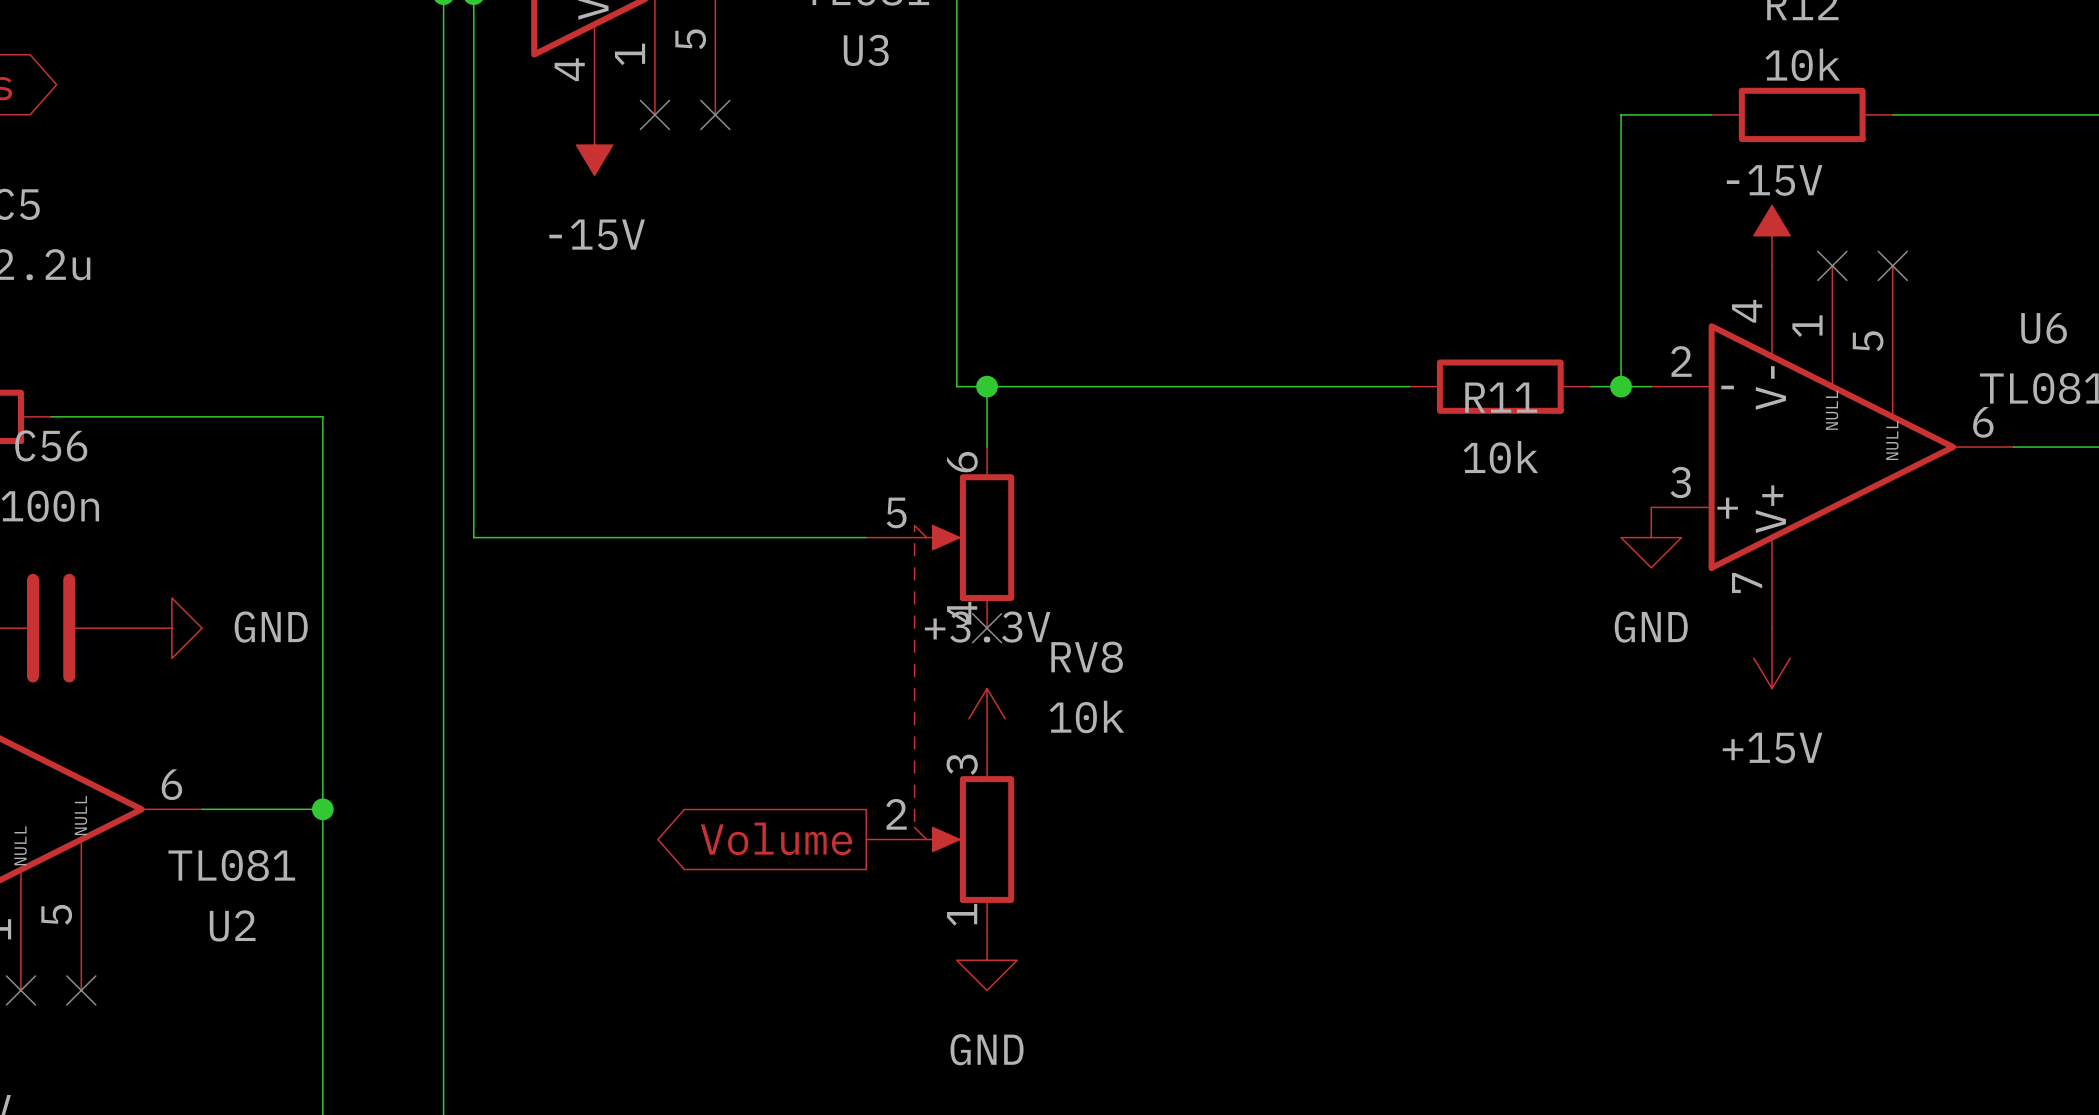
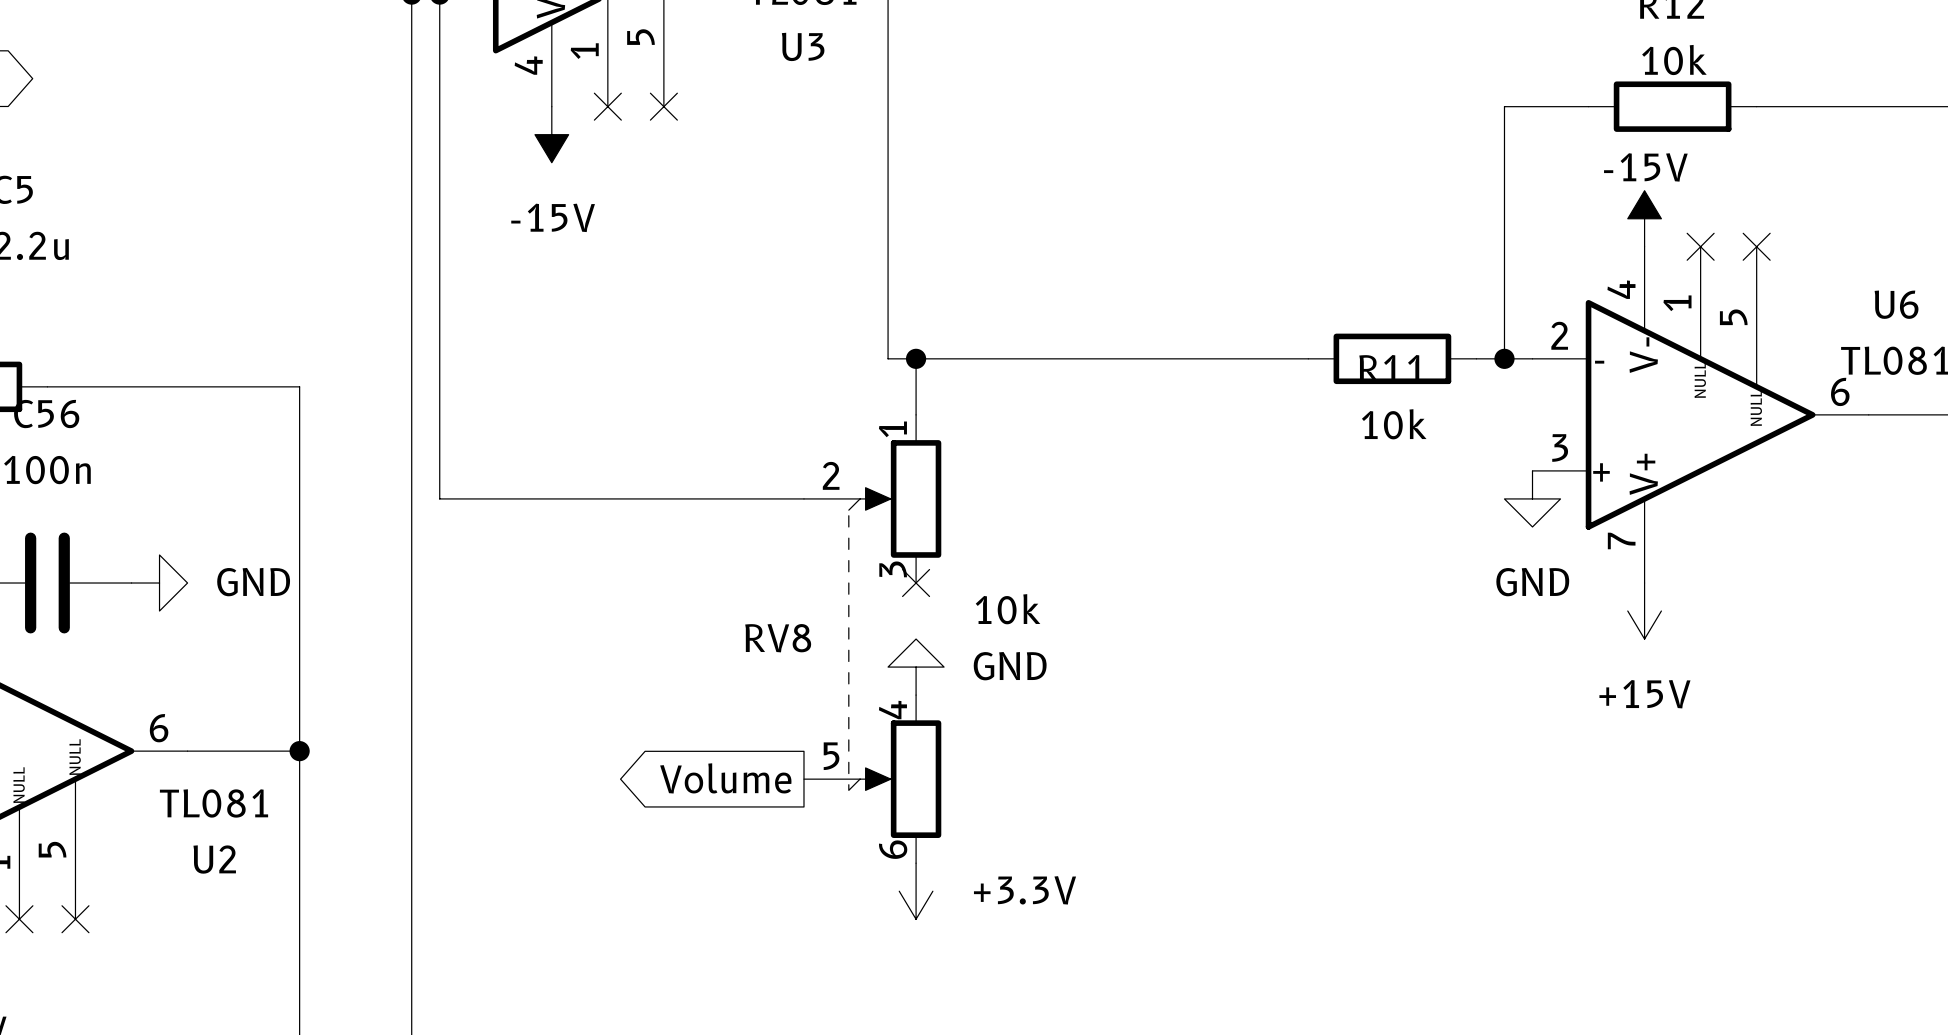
RV8 name position: RV8 (1087, 657) -> RV8 (778, 638)
RV8 flip: as is (964, 688) -> up-down (895, 639)
power symbol: +3.3V (987, 718) -> GND (916, 667)
power symbol: GND (987, 960) -> +3.3V (916, 891)

